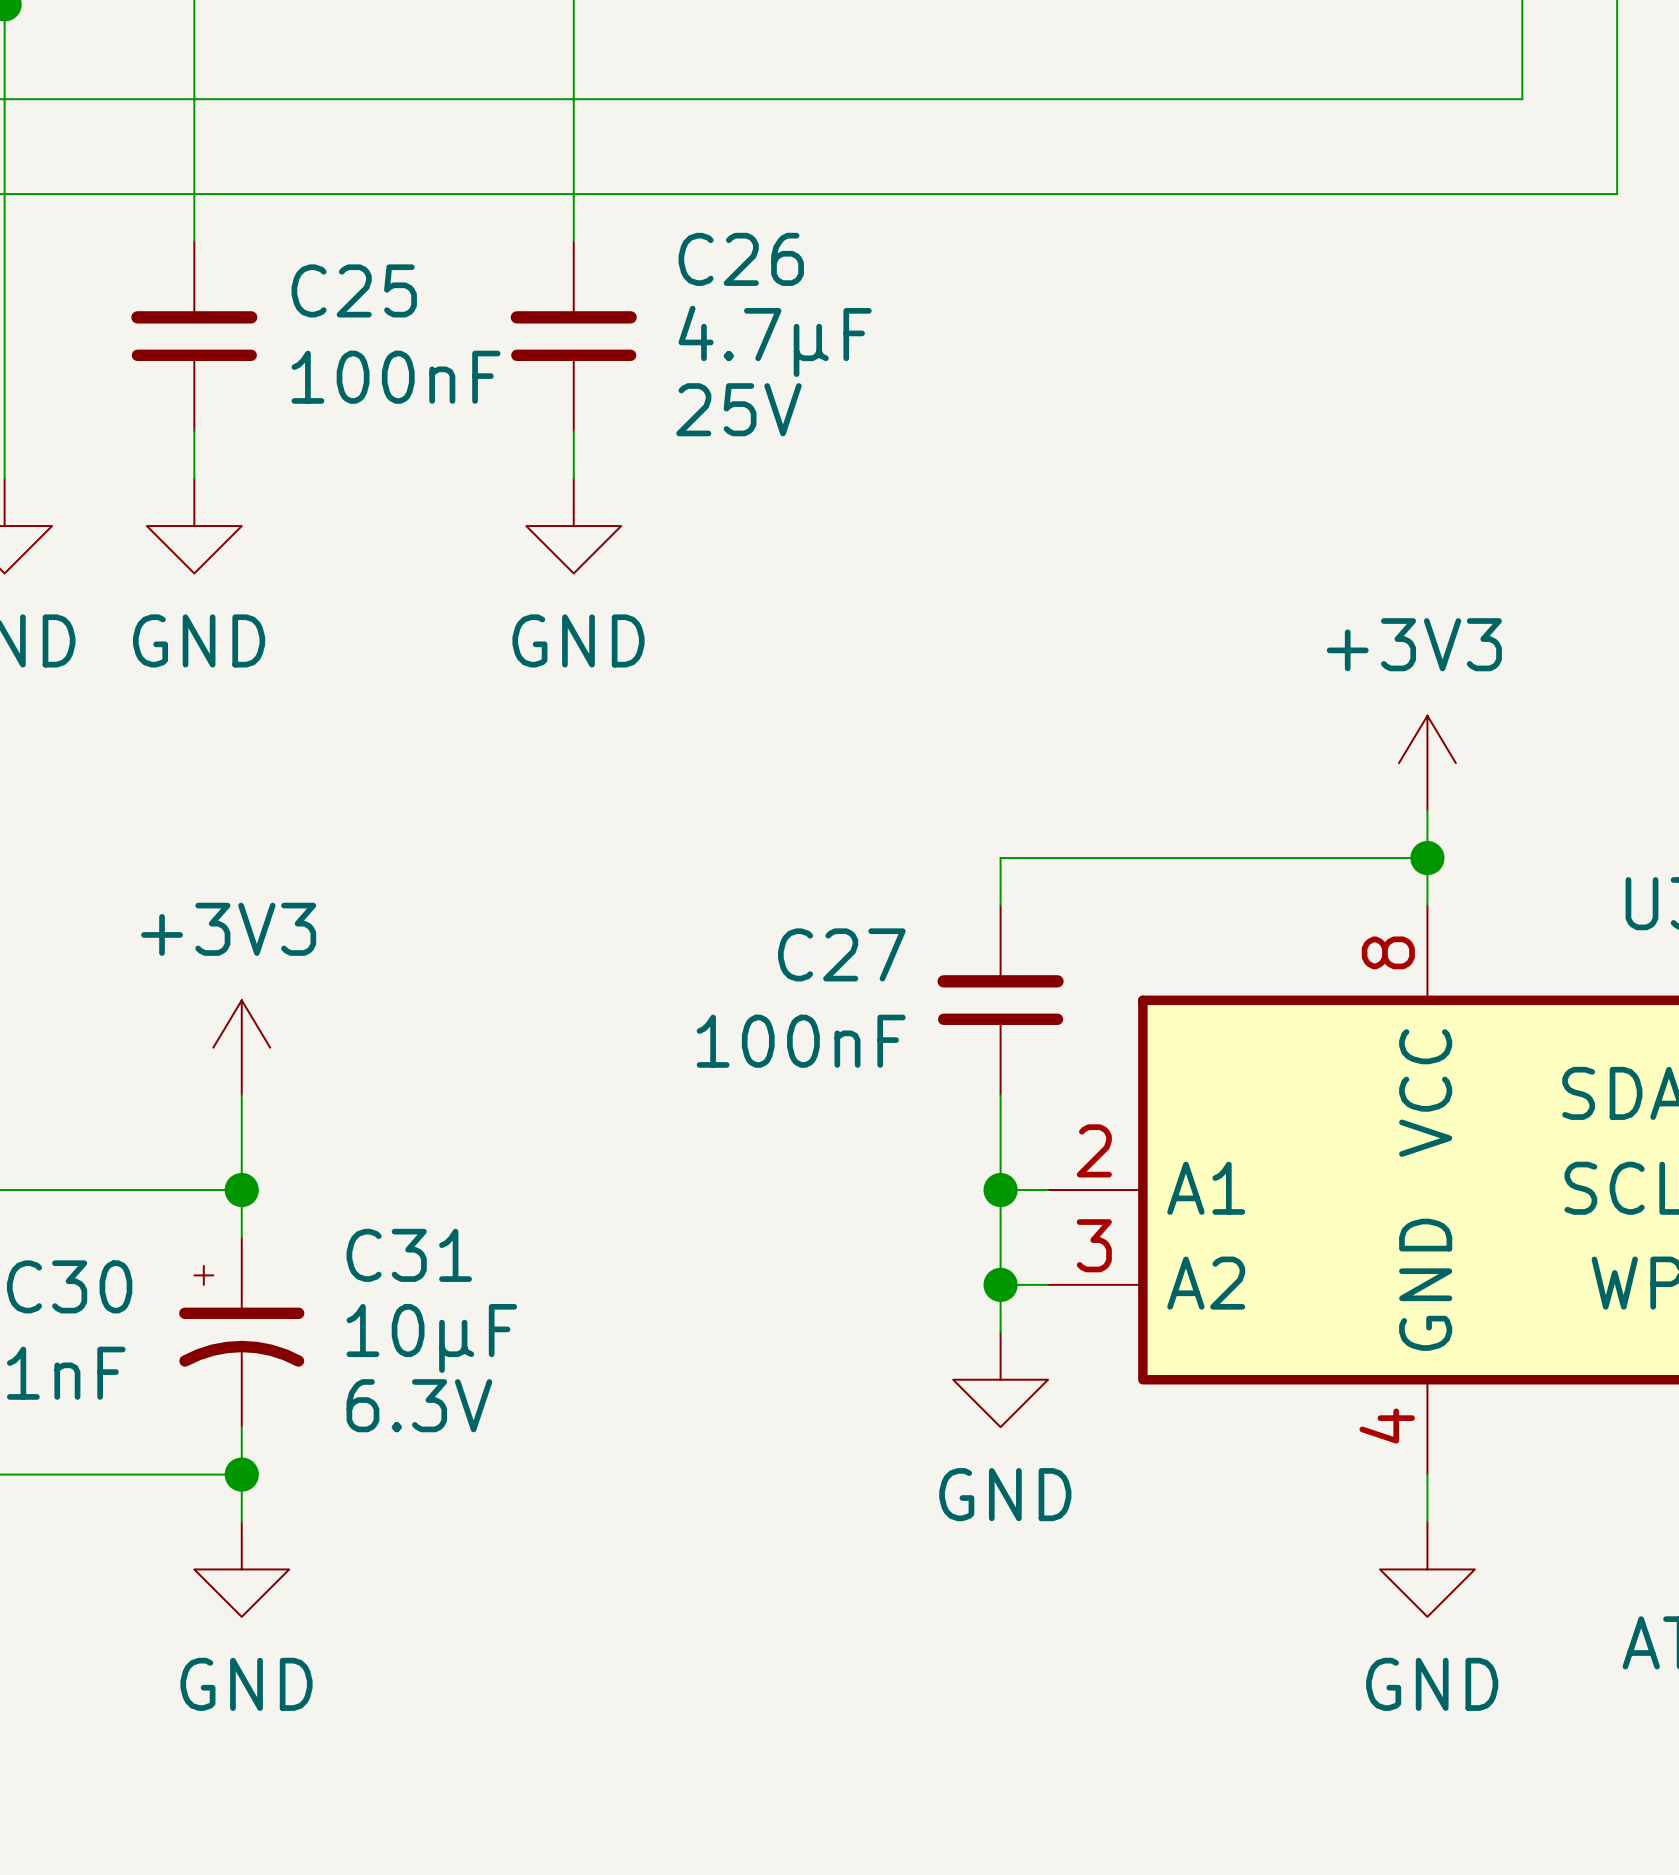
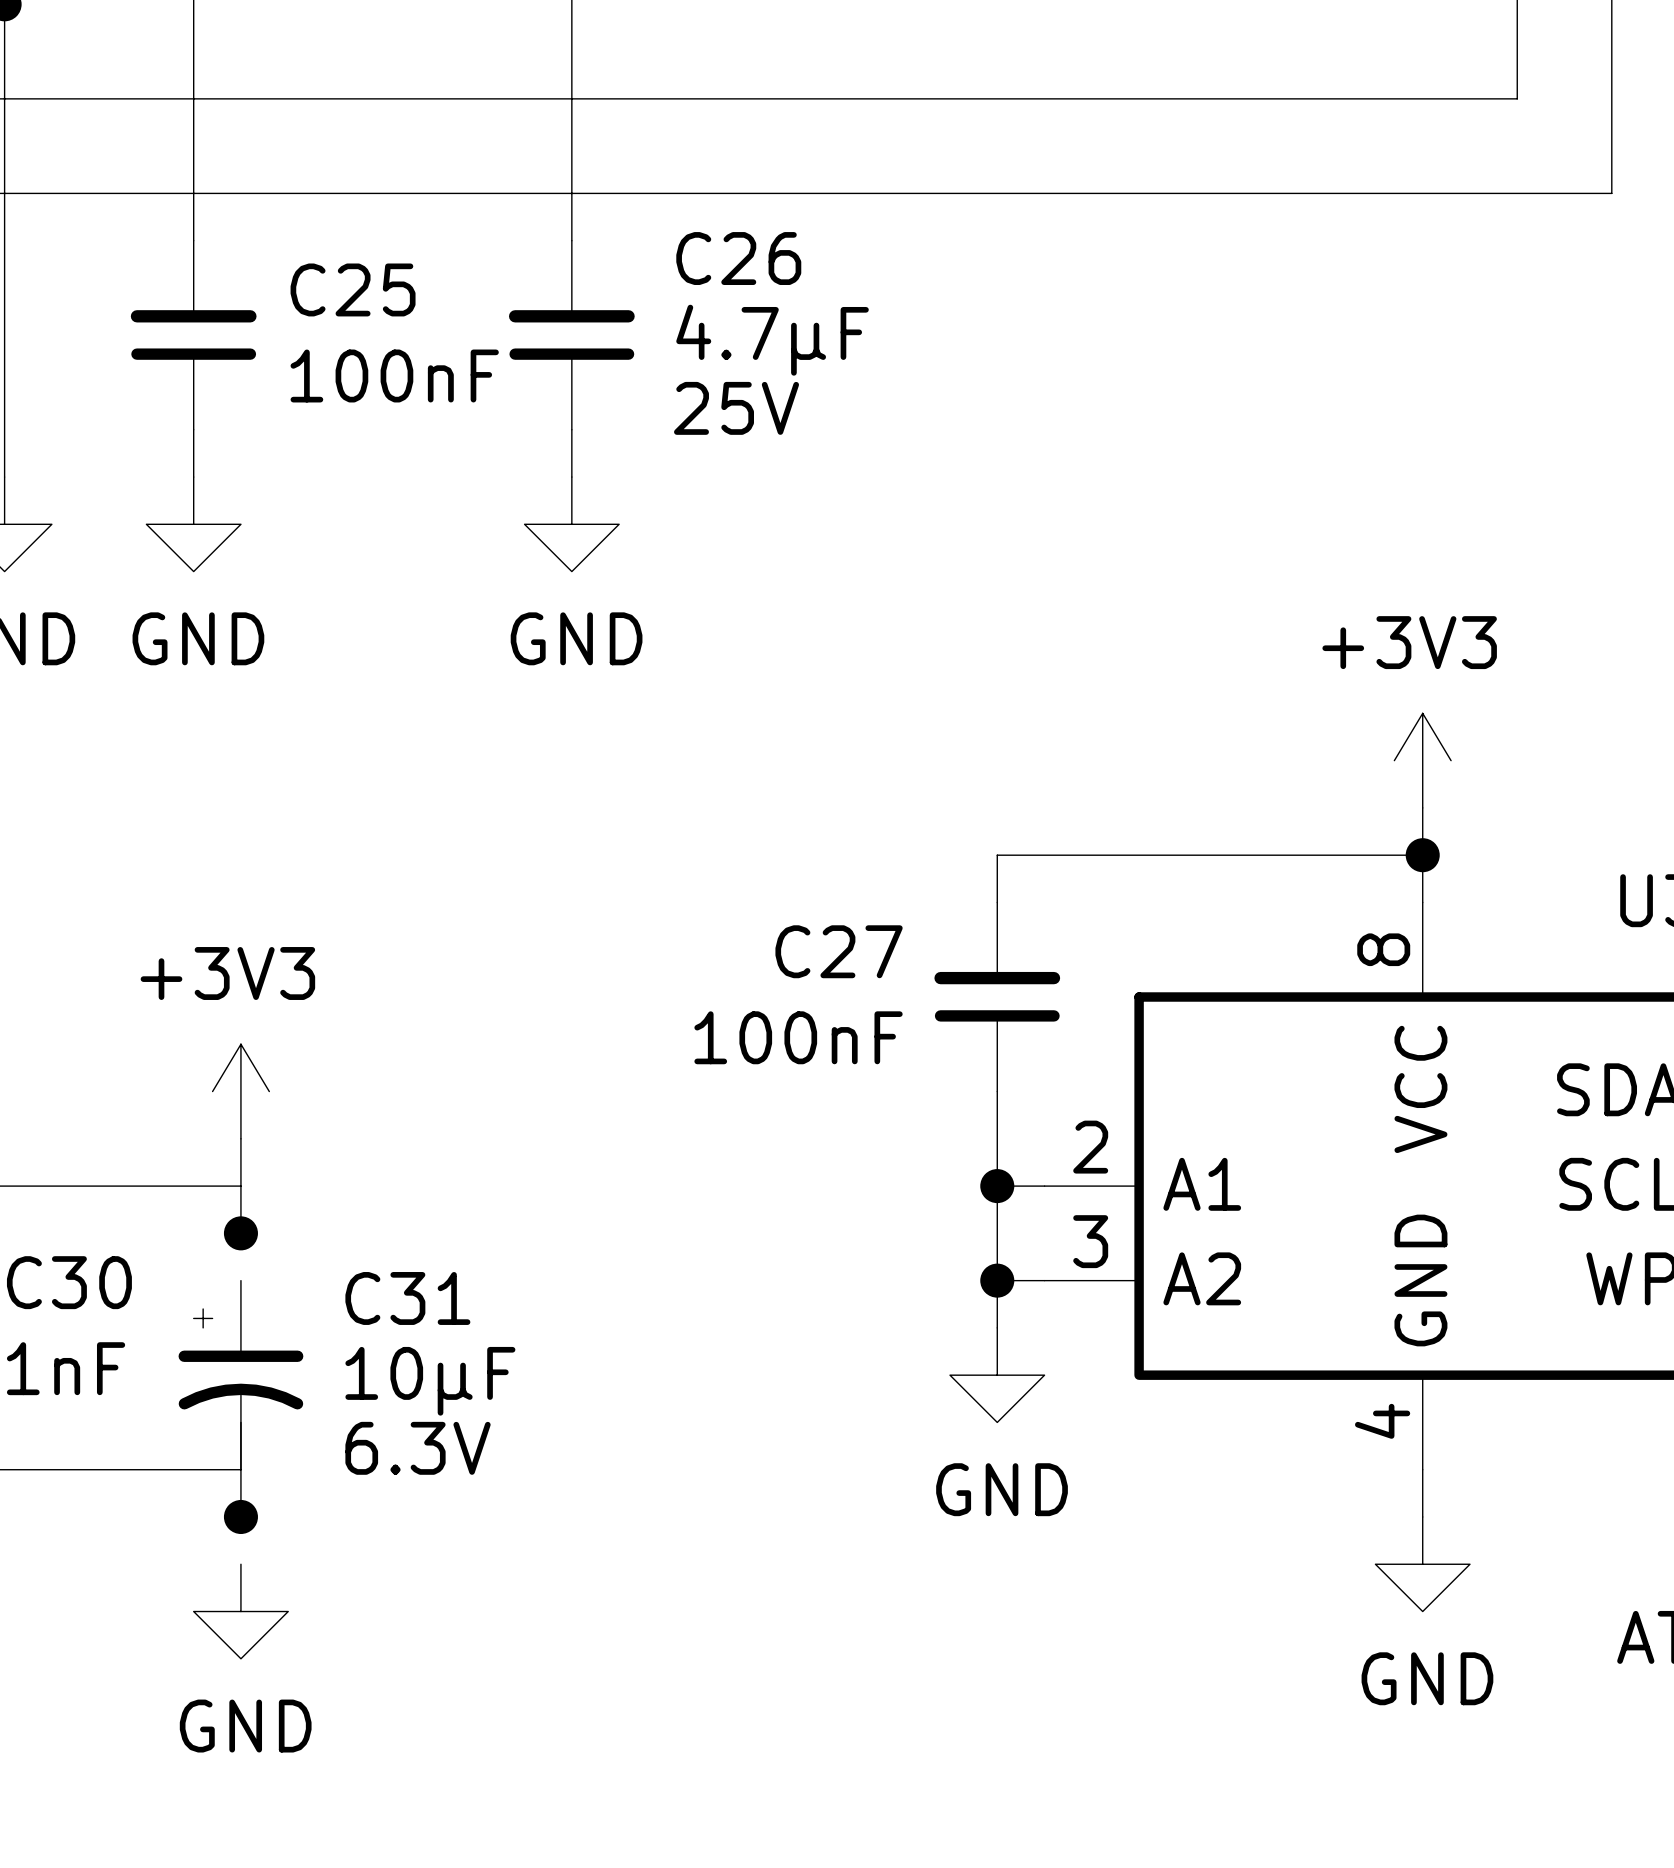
power symbol position: +3V3 (241, 1047) -> +3V3 (240, 1091)
junction position: (241, 1190) -> (240, 1233)
C31 position: (241, 1332) -> (240, 1375)
junction position: (241, 1474) -> (240, 1516)
power symbol position: GND (241, 1569) -> GND (240, 1611)

